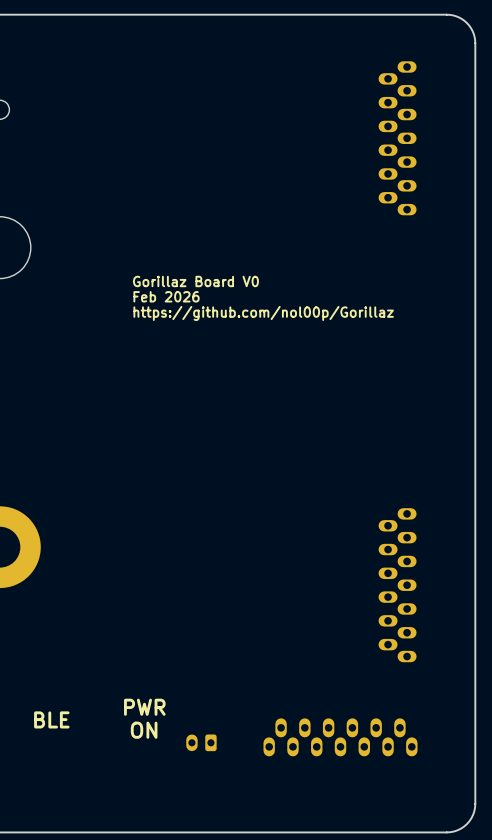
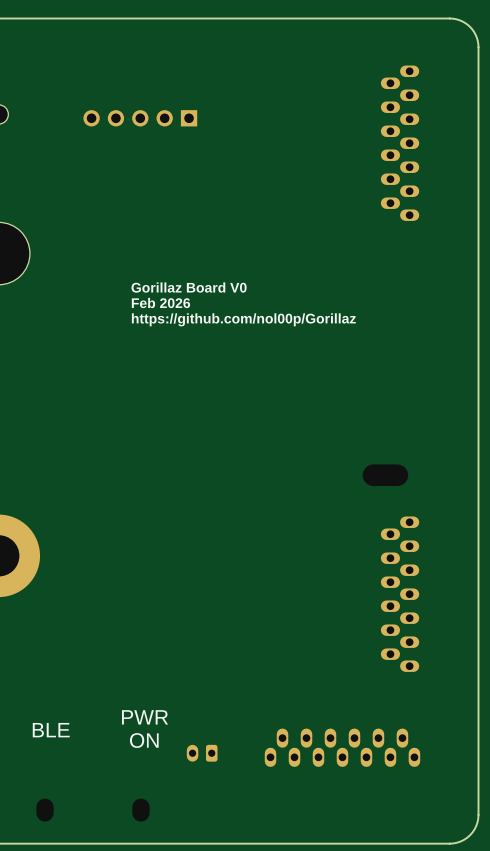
part: none -> (140, 118)

